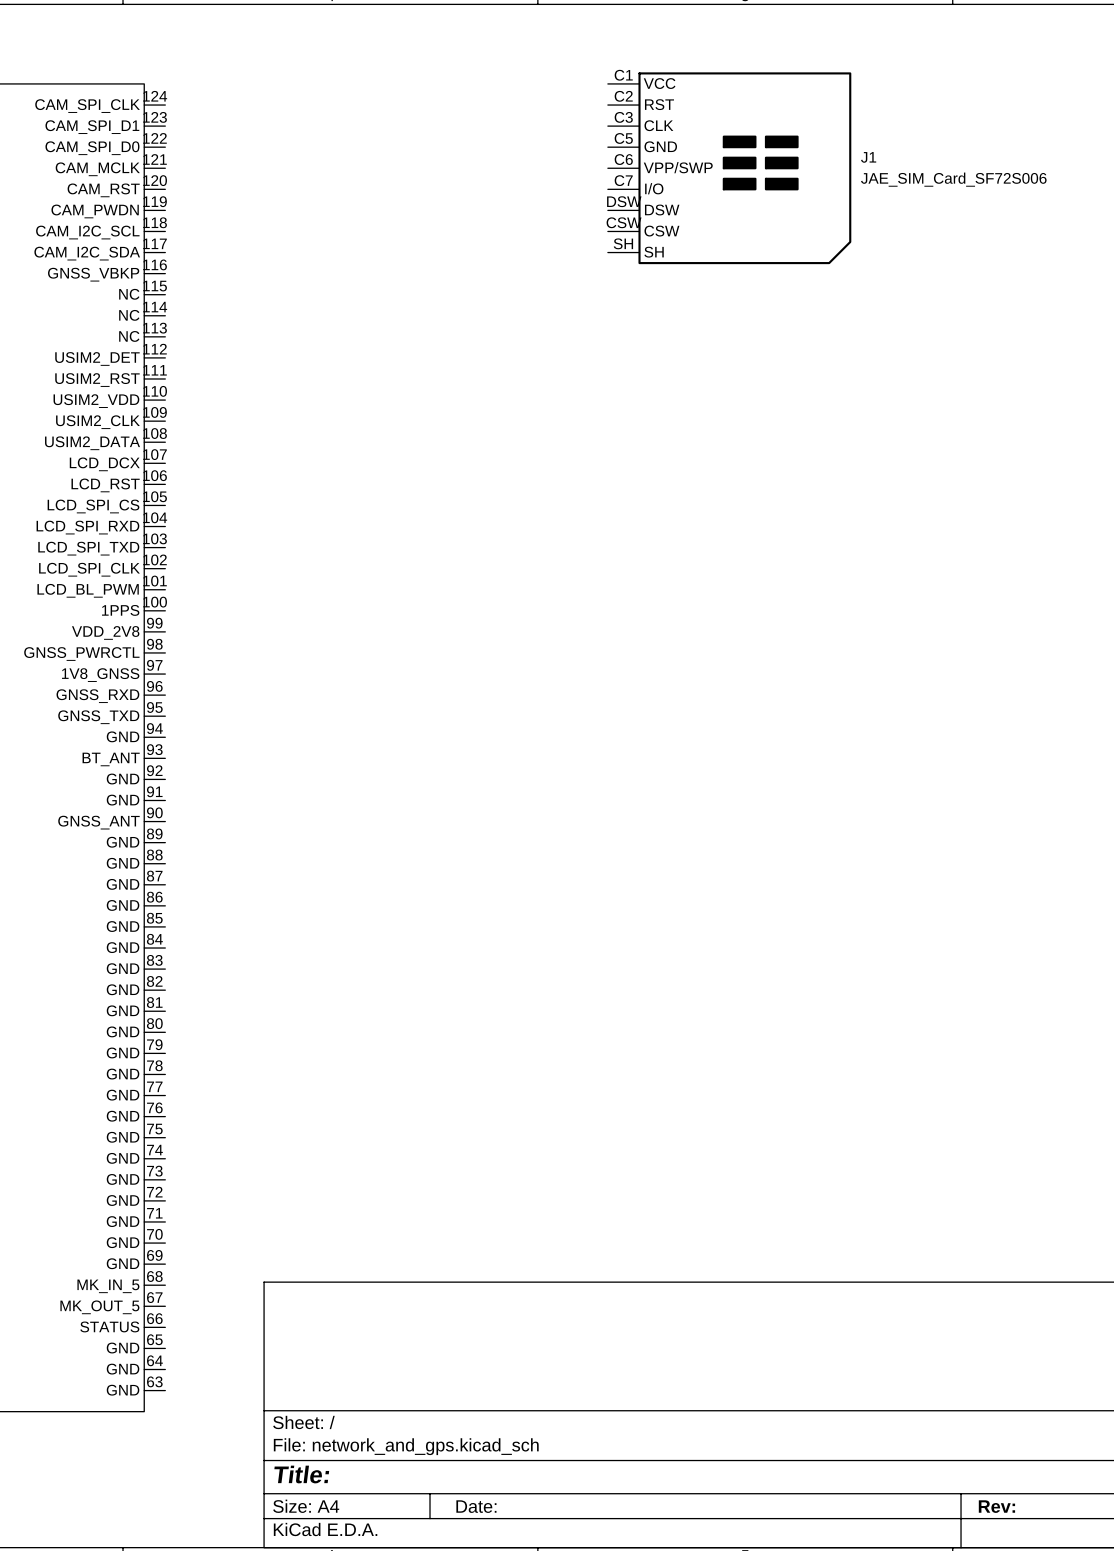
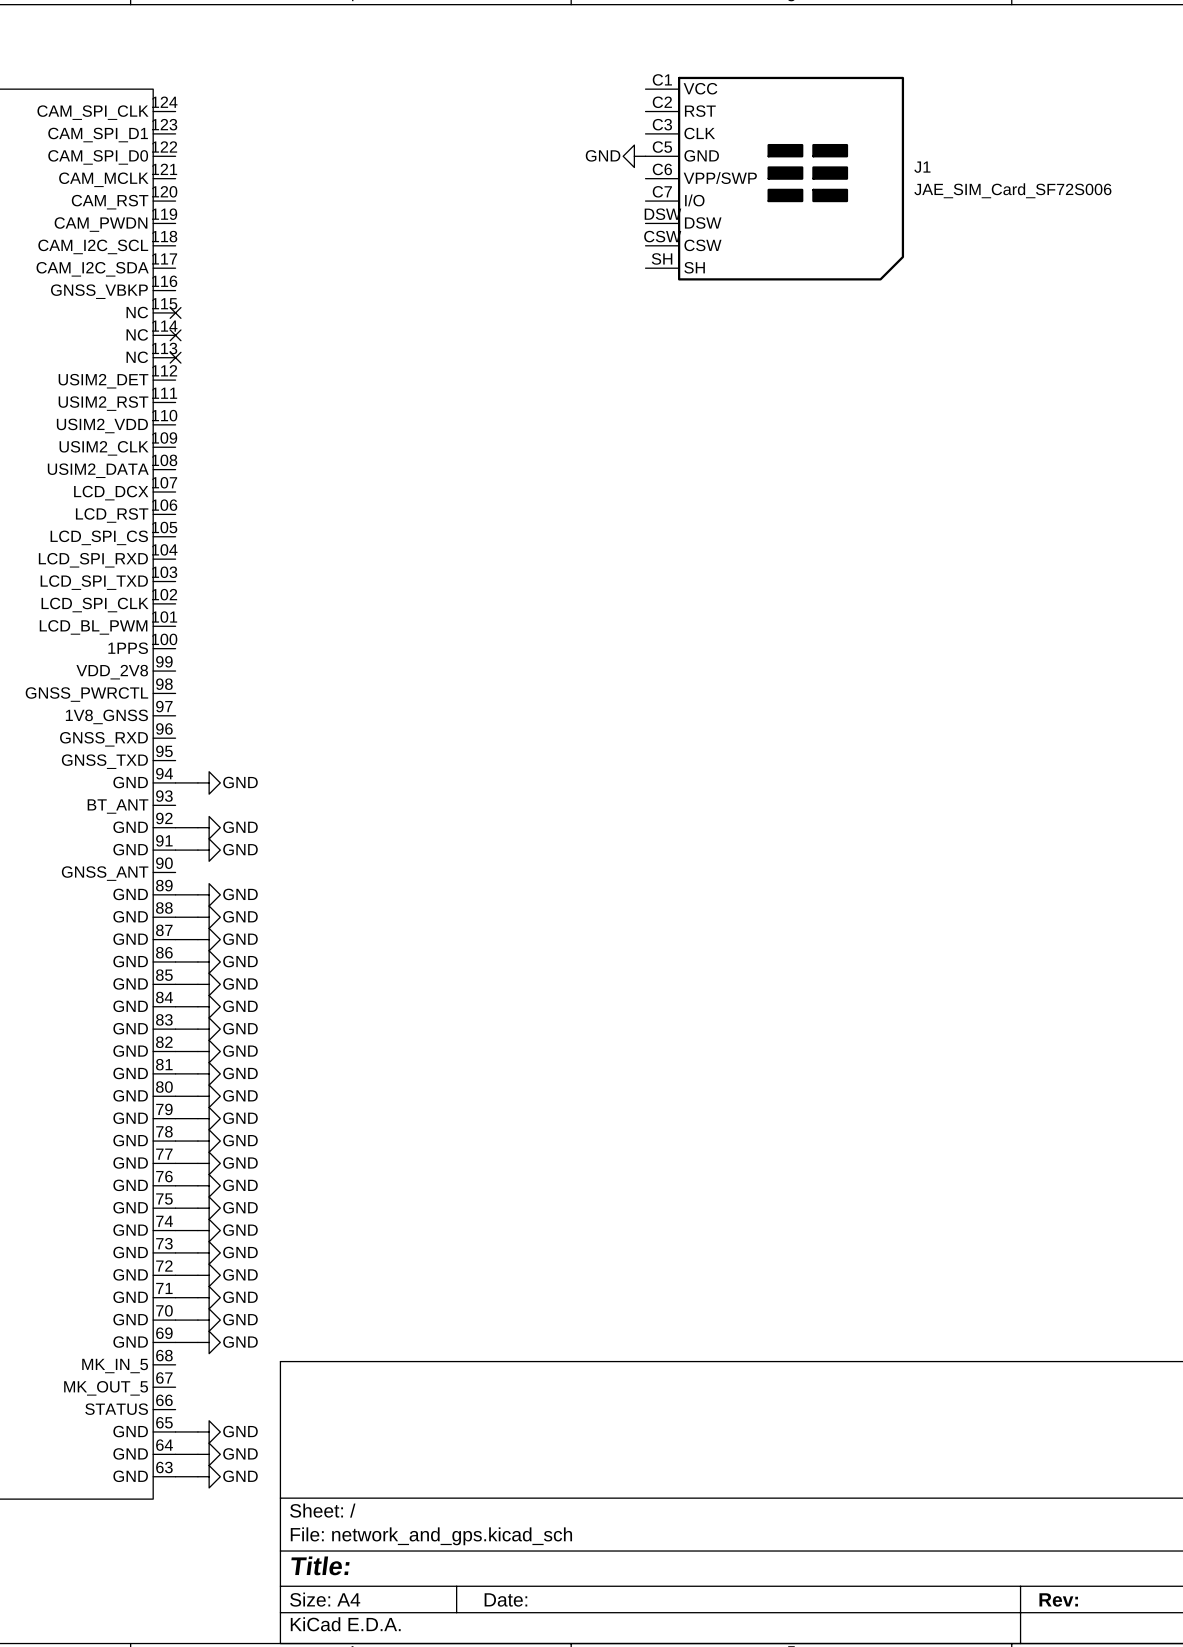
power symbol: none -> GND (634, 156)
no-connect mark: none -> (175, 312)
no-connect mark: none -> (175, 335)
no-connect mark: none -> (175, 357)
wire: none -> (175, 782) (197, 782)
power symbol: none -> GND (209, 782)
wire: none -> (175, 827) (197, 827)
power symbol: none -> GND (209, 827)
wire: none -> (175, 850) (197, 850)
power symbol: none -> GND (209, 850)
wire: none -> (175, 894) (197, 894)
power symbol: none -> GND (209, 894)
wire: none -> (175, 917) (197, 917)
power symbol: none -> GND (209, 917)
wire: none -> (175, 939) (197, 939)
power symbol: none -> GND (209, 939)
wire: none -> (175, 961) (197, 961)
power symbol: none -> GND (209, 961)
wire: none -> (175, 984) (197, 984)
power symbol: none -> GND (209, 984)
wire: none -> (175, 1006) (197, 1006)
power symbol: none -> GND (209, 1006)
wire: none -> (175, 1029) (197, 1029)
power symbol: none -> GND (209, 1029)
wire: none -> (175, 1051) (197, 1051)
power symbol: none -> GND (209, 1051)
wire: none -> (175, 1073) (197, 1073)
power symbol: none -> GND (209, 1073)
wire: none -> (175, 1096) (197, 1096)
power symbol: none -> GND (209, 1096)
wire: none -> (175, 1118) (197, 1118)
power symbol: none -> GND (209, 1118)
wire: none -> (175, 1141) (197, 1141)
power symbol: none -> GND (209, 1141)
wire: none -> (175, 1163) (197, 1163)
power symbol: none -> GND (209, 1163)
wire: none -> (175, 1185) (197, 1185)
power symbol: none -> GND (209, 1185)
wire: none -> (175, 1208) (197, 1208)
power symbol: none -> GND (209, 1208)
wire: none -> (175, 1230) (197, 1230)
power symbol: none -> GND (209, 1230)
wire: none -> (175, 1252) (197, 1252)
power symbol: none -> GND (209, 1252)
wire: none -> (175, 1275) (197, 1275)
power symbol: none -> GND (209, 1275)
wire: none -> (175, 1297) (197, 1297)
power symbol: none -> GND (209, 1297)
wire: none -> (175, 1320) (197, 1320)
power symbol: none -> GND (209, 1320)
wire: none -> (175, 1342) (197, 1342)
power symbol: none -> GND (209, 1342)
wire: none -> (175, 1431) (197, 1431)
power symbol: none -> GND (209, 1431)
wire: none -> (175, 1454) (197, 1454)
power symbol: none -> GND (209, 1454)
wire: none -> (175, 1476) (197, 1476)
power symbol: none -> GND (209, 1476)

